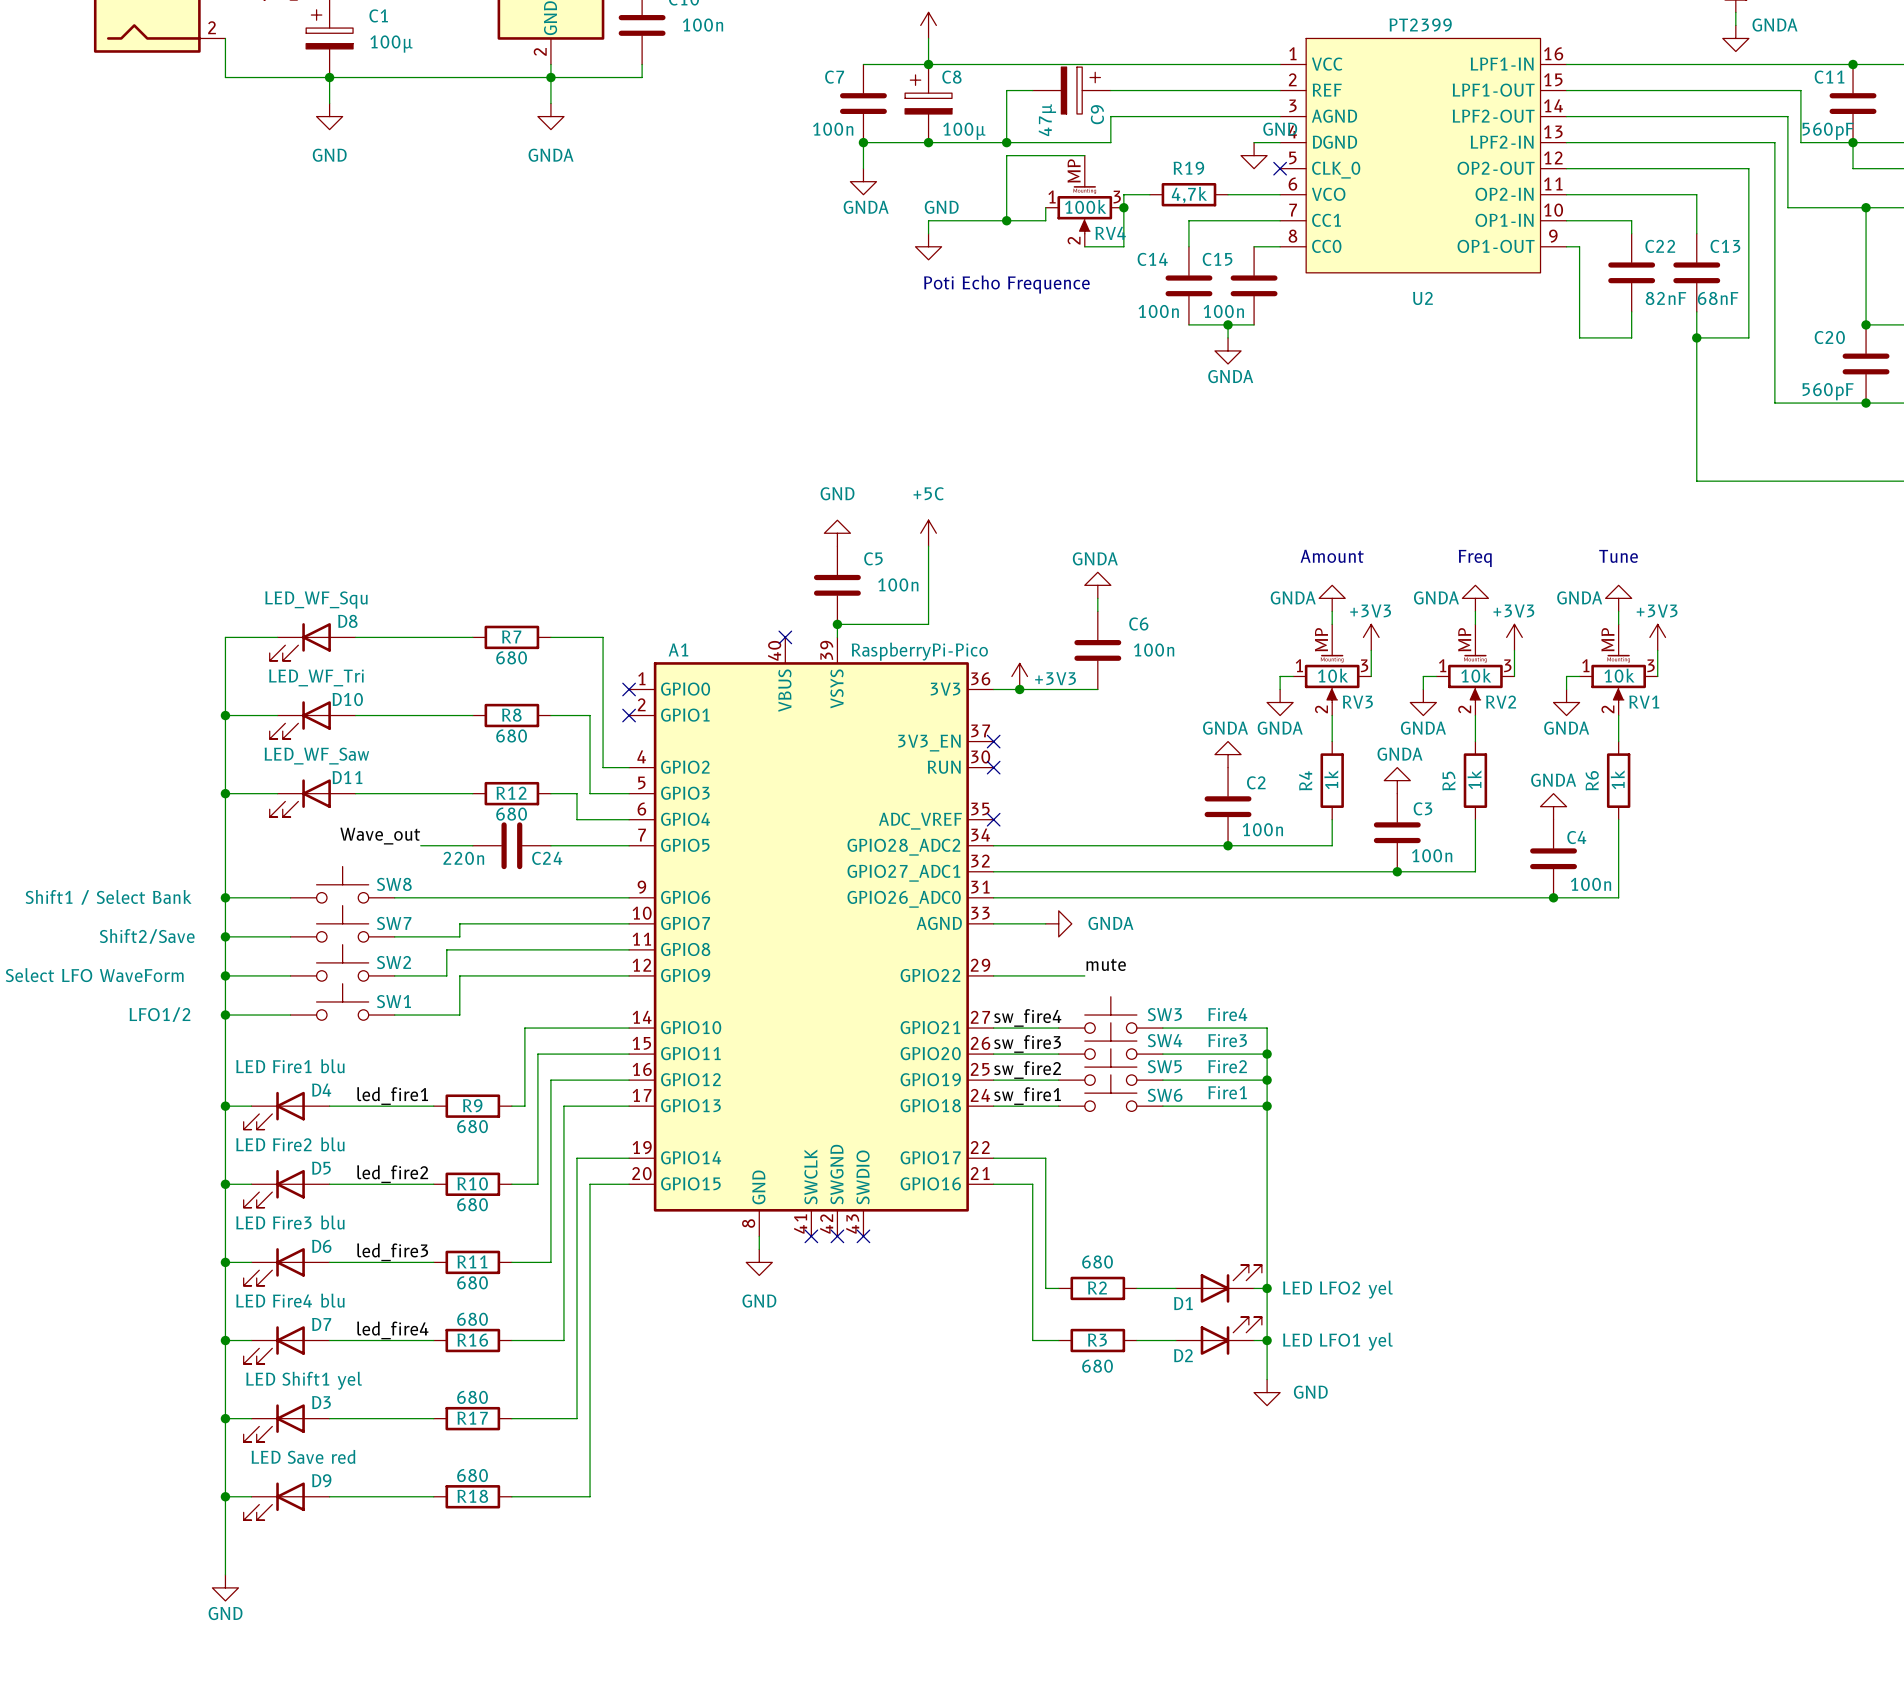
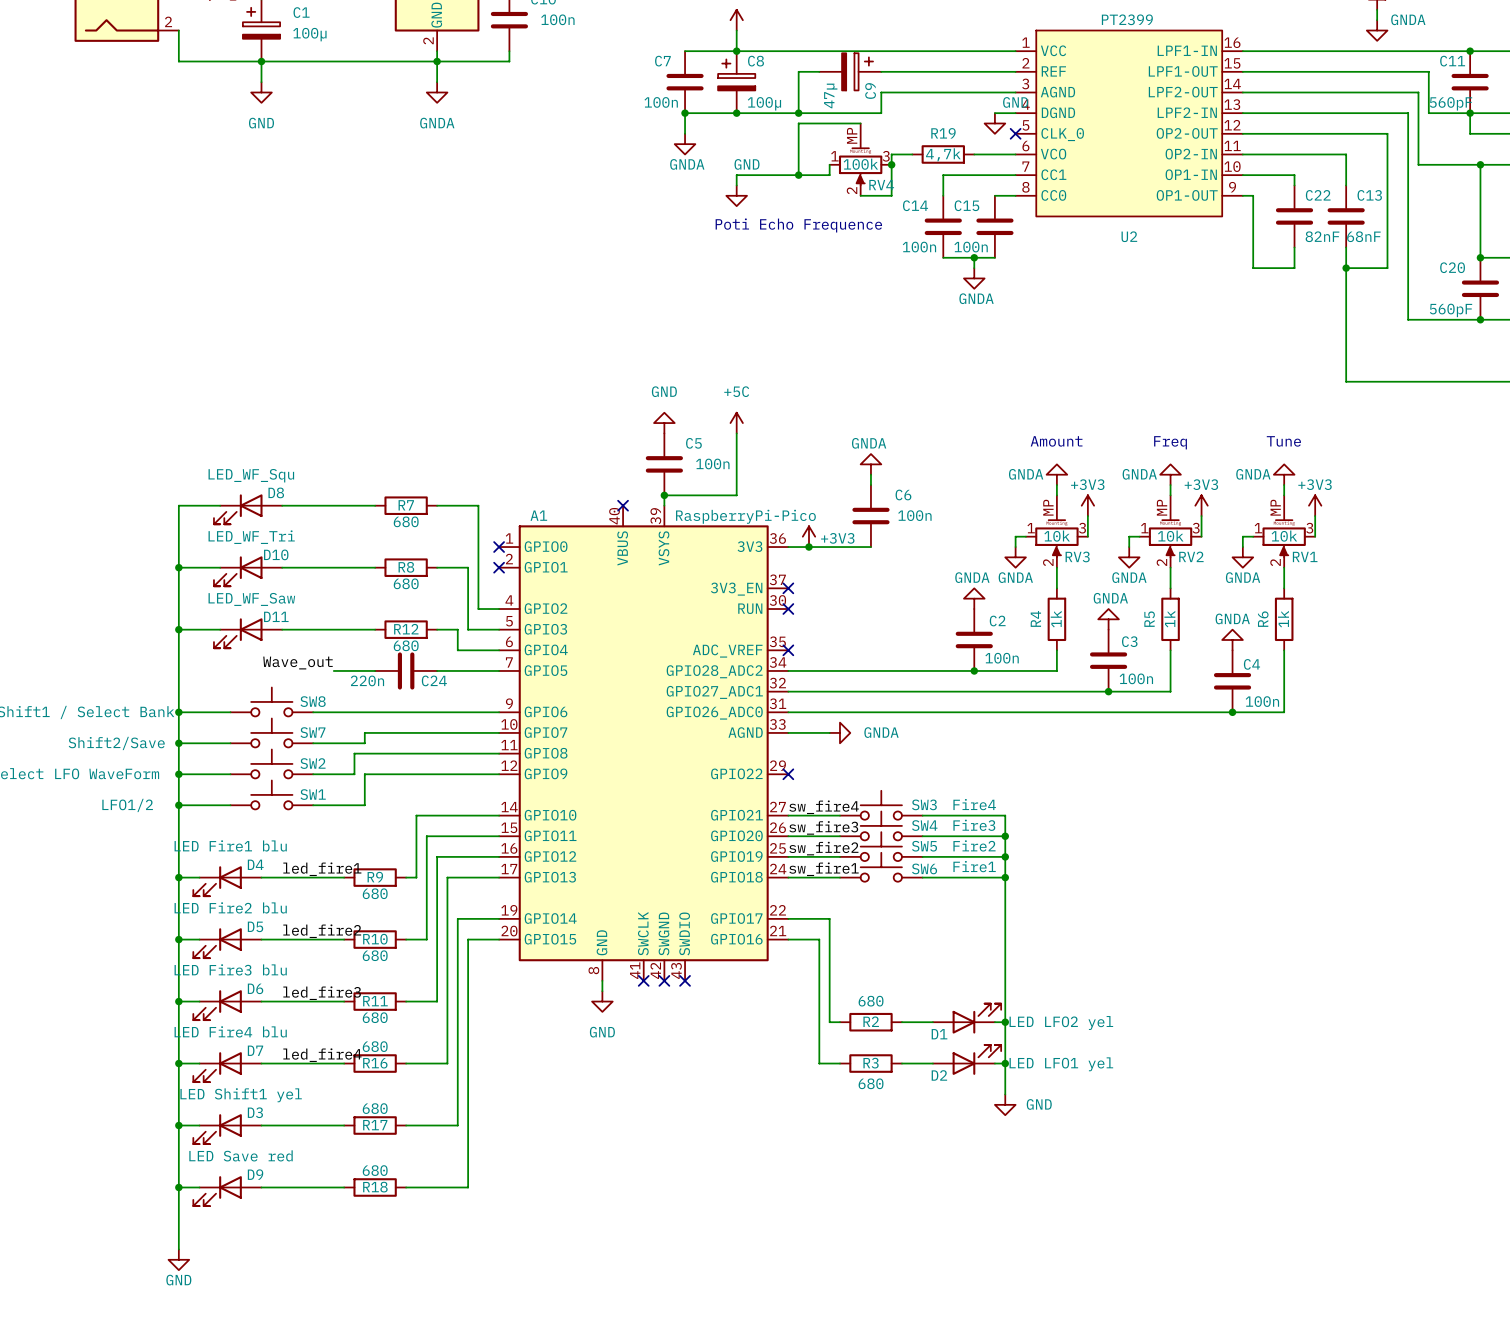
label: mute (1106, 964) -> none
wire: (993, 975) (1084, 975) -> none
no-connect mark: none -> (788, 774)

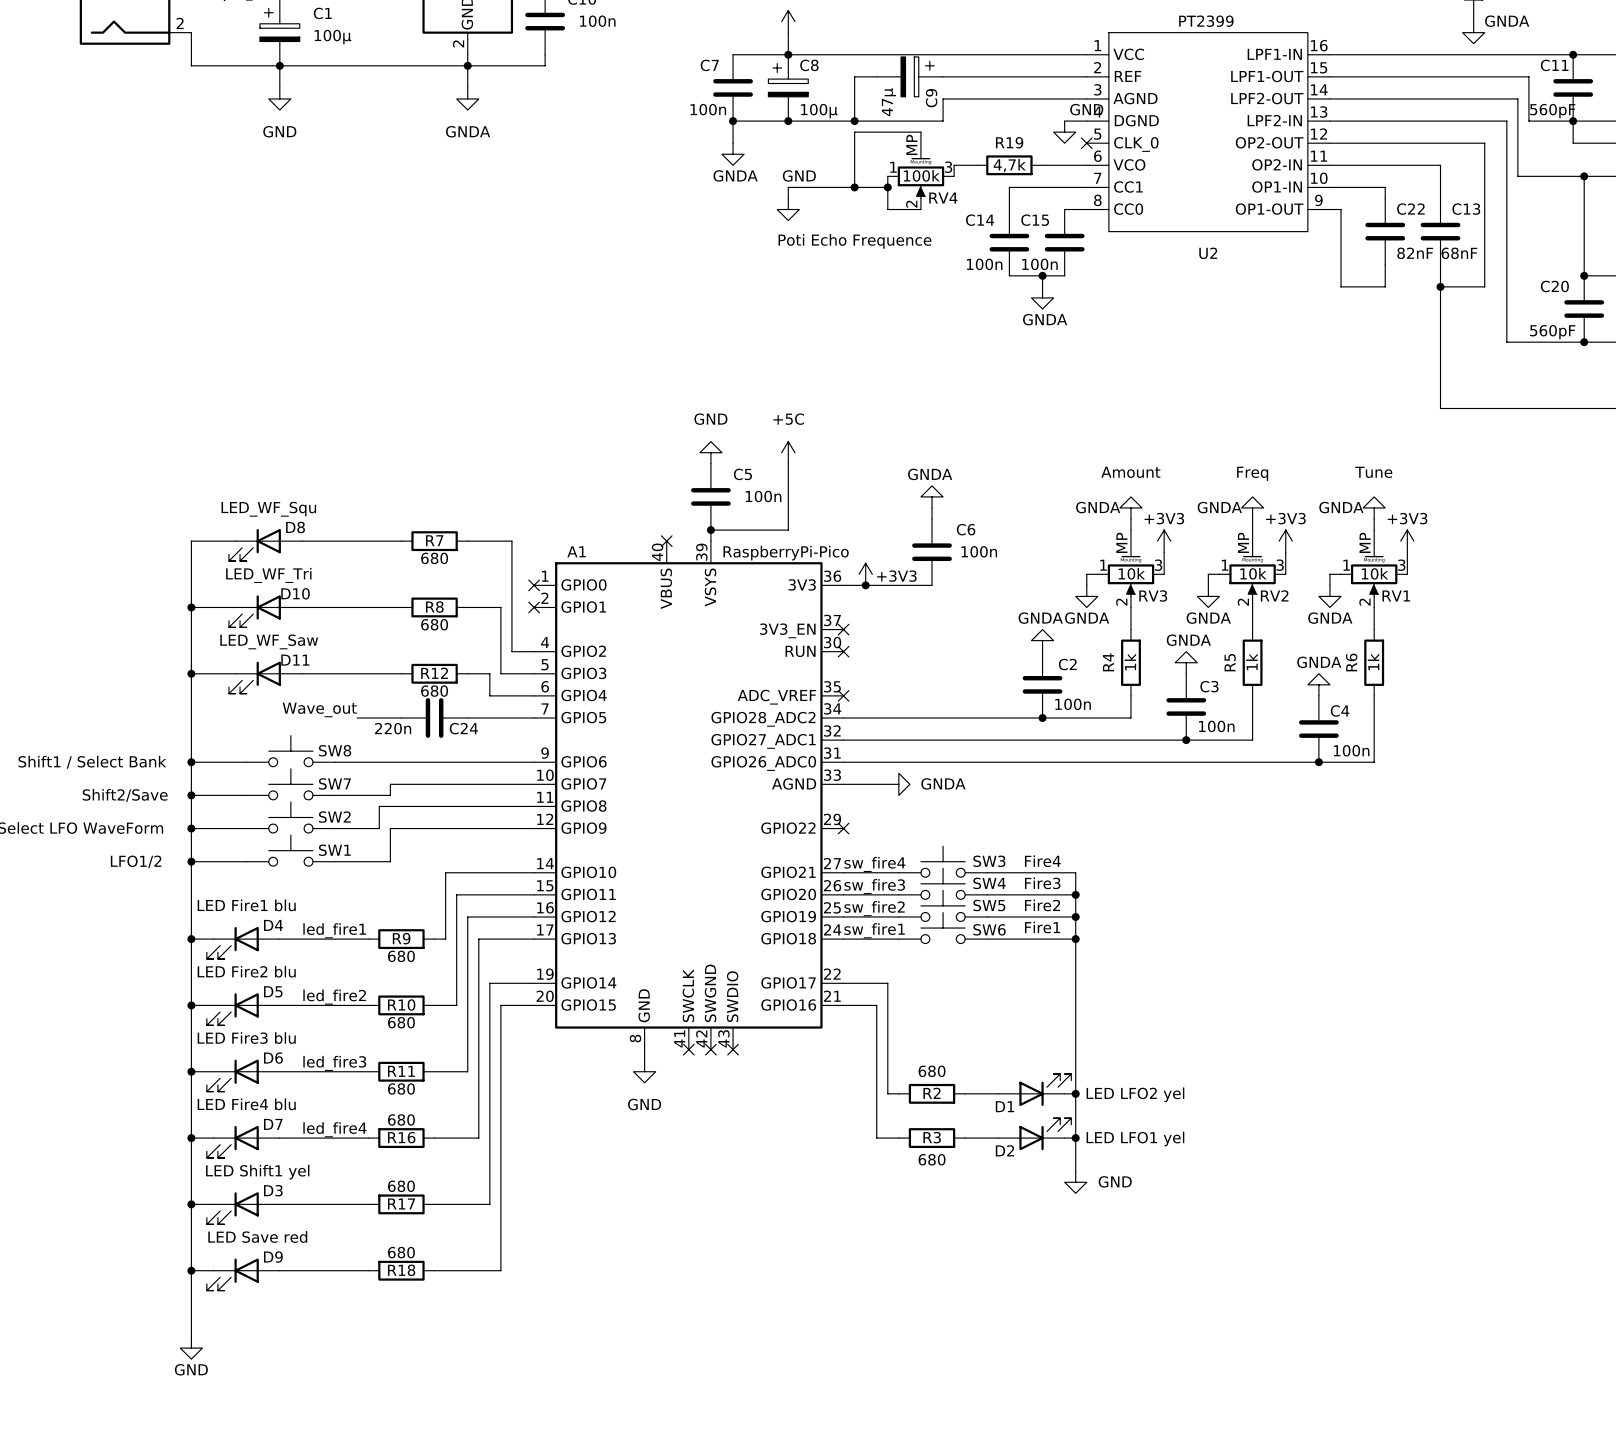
wire: (891, 164) (891, 195) (860, 195) -> (887, 187) (887, 209) (920, 209)
junction: (891, 164) -> none
junction: none -> (887, 187)

